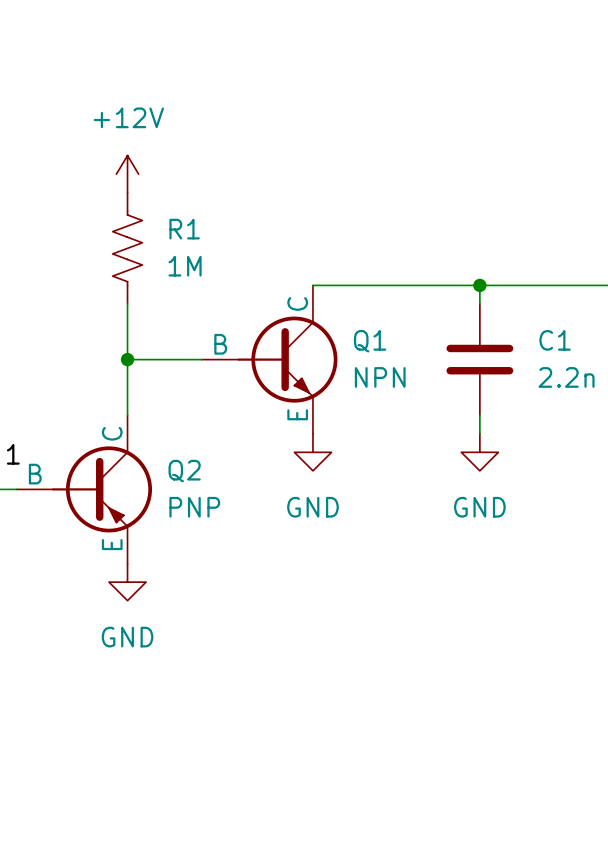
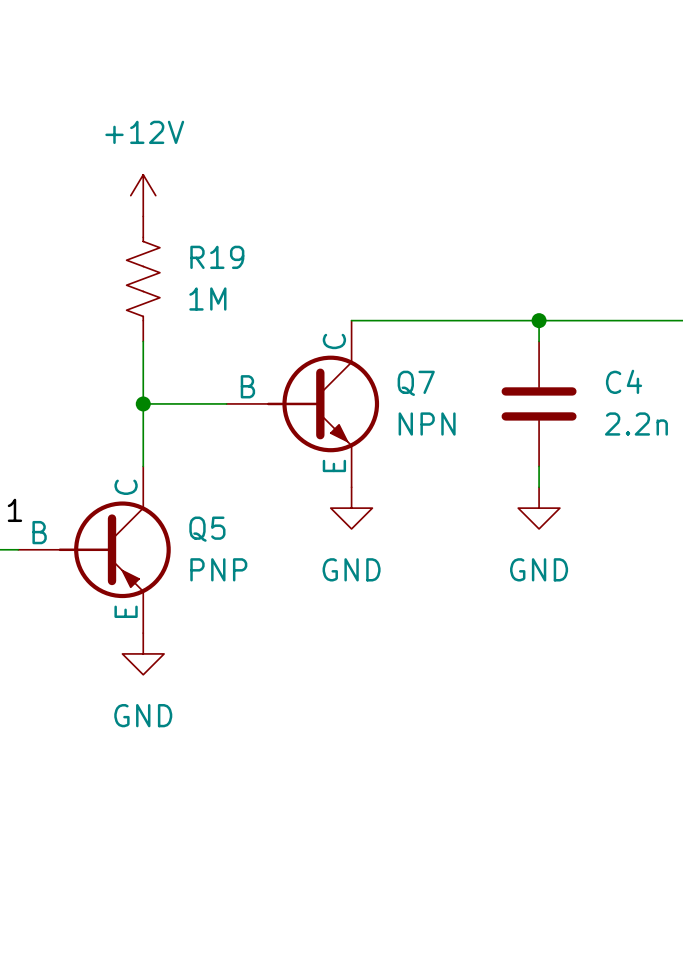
R1 name: R1 (184, 229) -> R19 (217, 257)
C1 name: C1 (555, 340) -> C4 (624, 381)
Q1 name: Q1 (370, 341) -> Q7 (416, 383)
Q2 name: Q2 (184, 471) -> Q5 (207, 529)

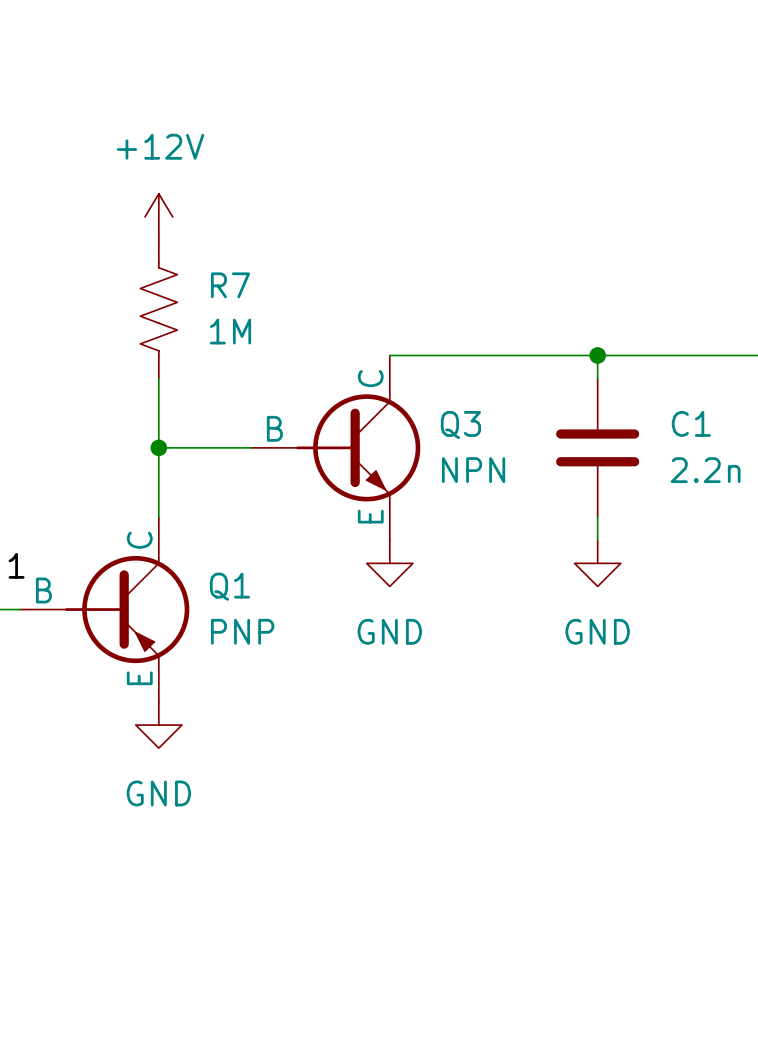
R19 name: R19 (217, 257) -> R7 (230, 285)
C4 name: C4 (624, 381) -> C1 (691, 423)
Q7 name: Q7 (416, 383) -> Q3 (460, 425)
Q5 name: Q5 (207, 529) -> Q1 (229, 586)

